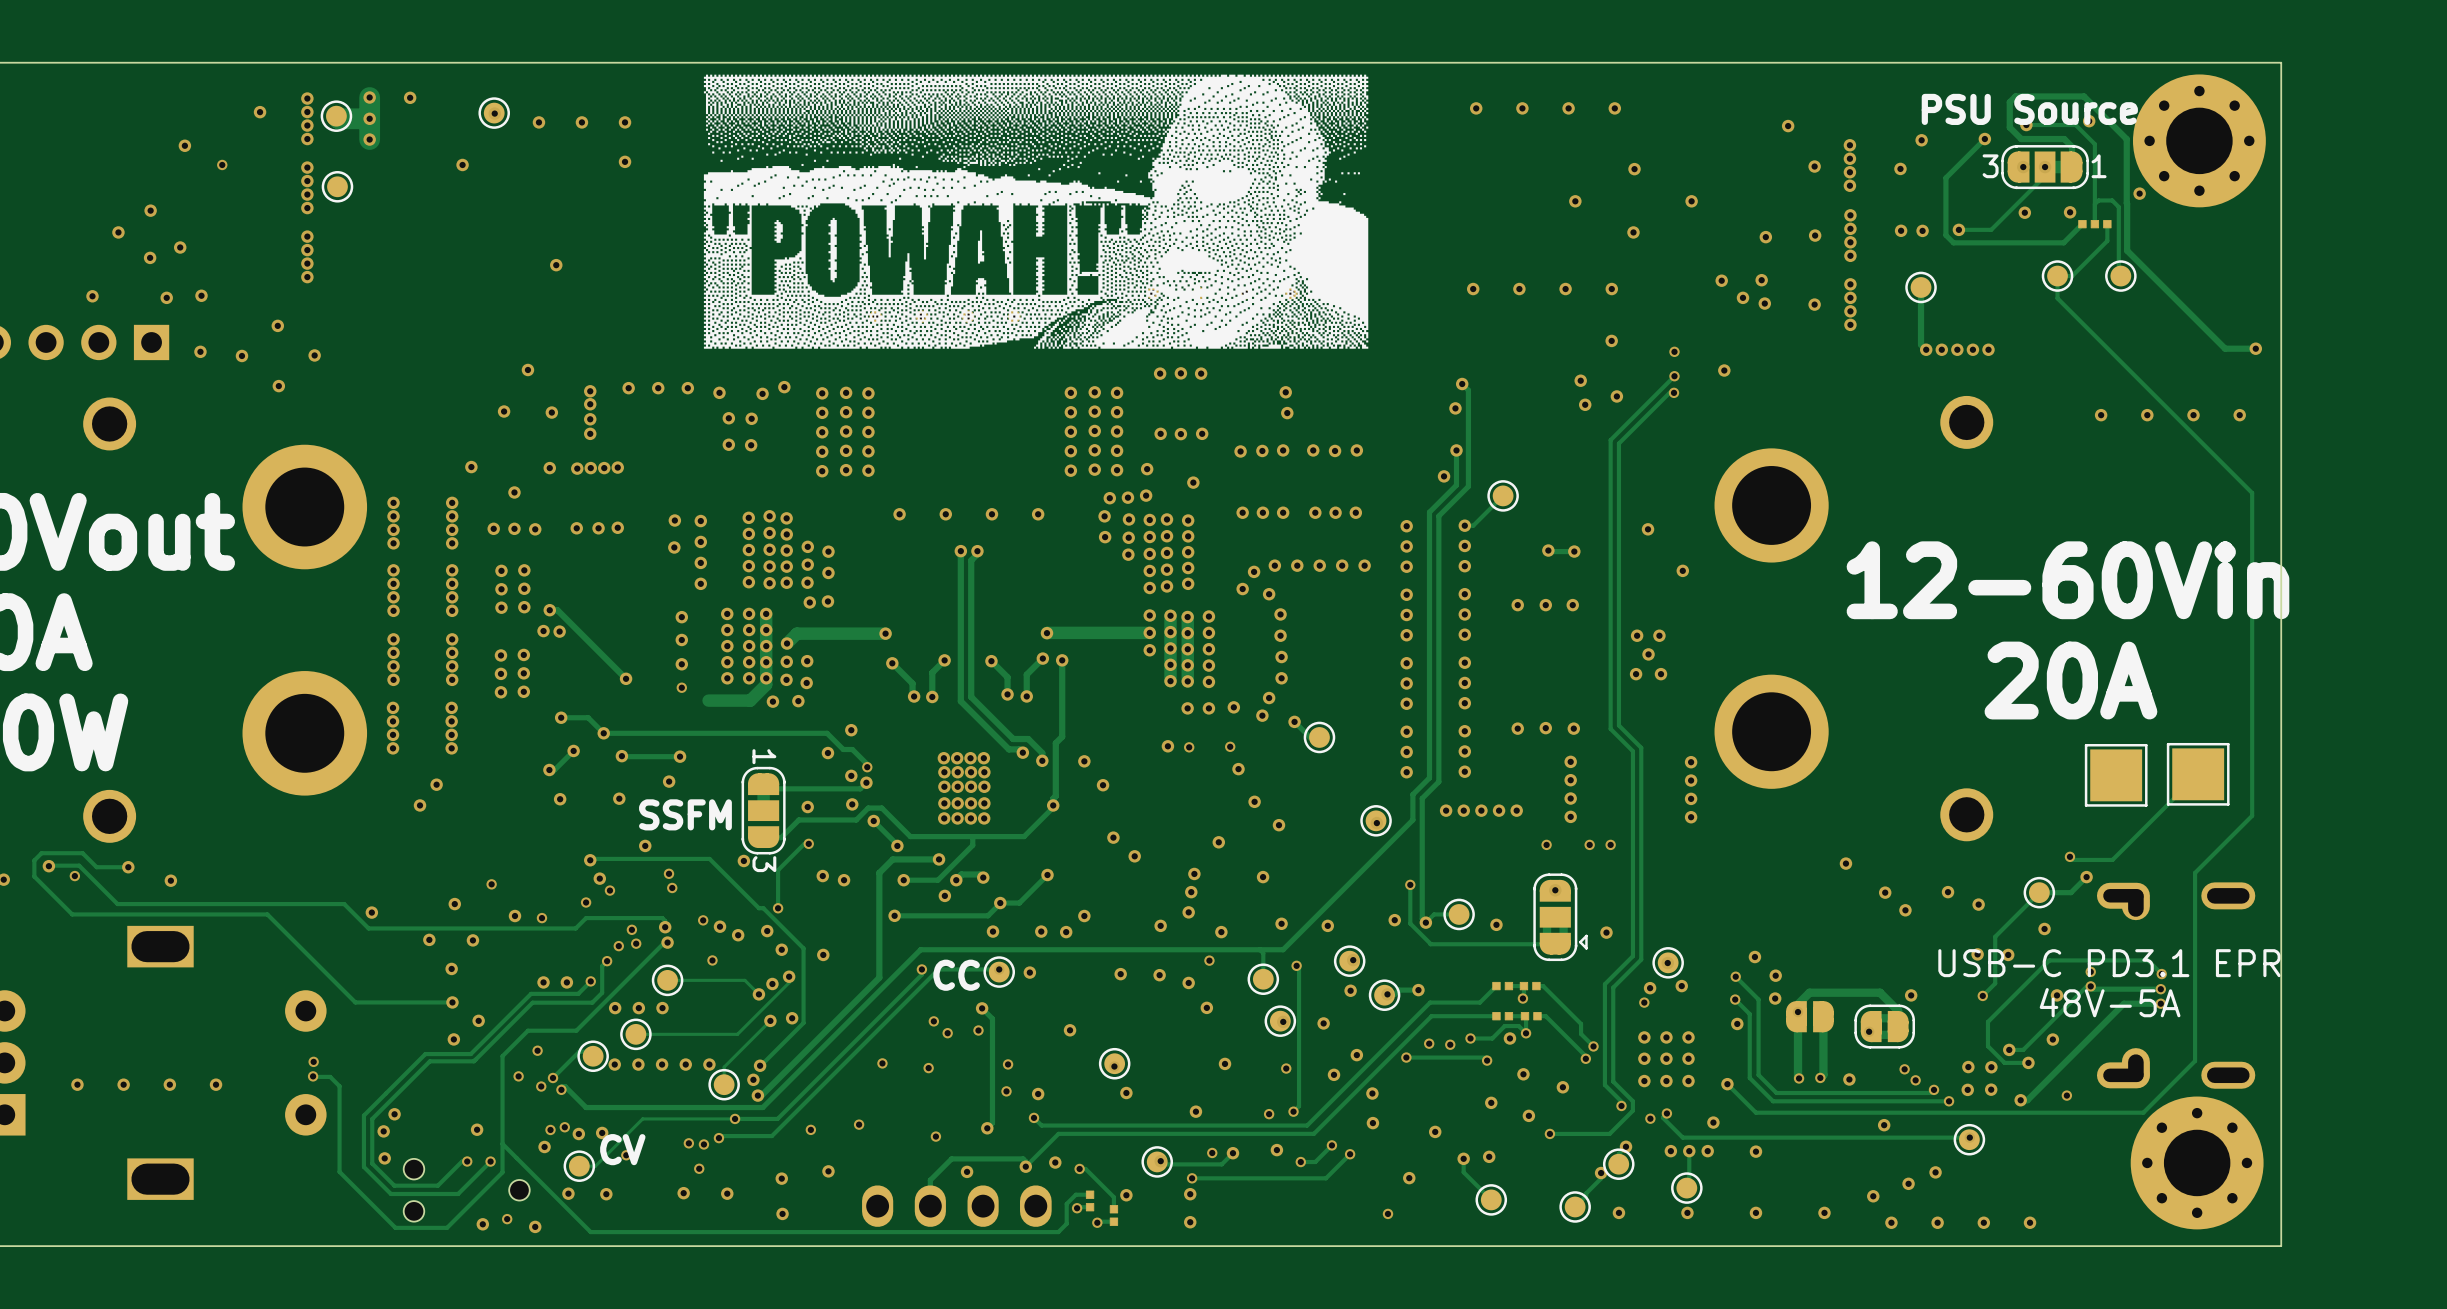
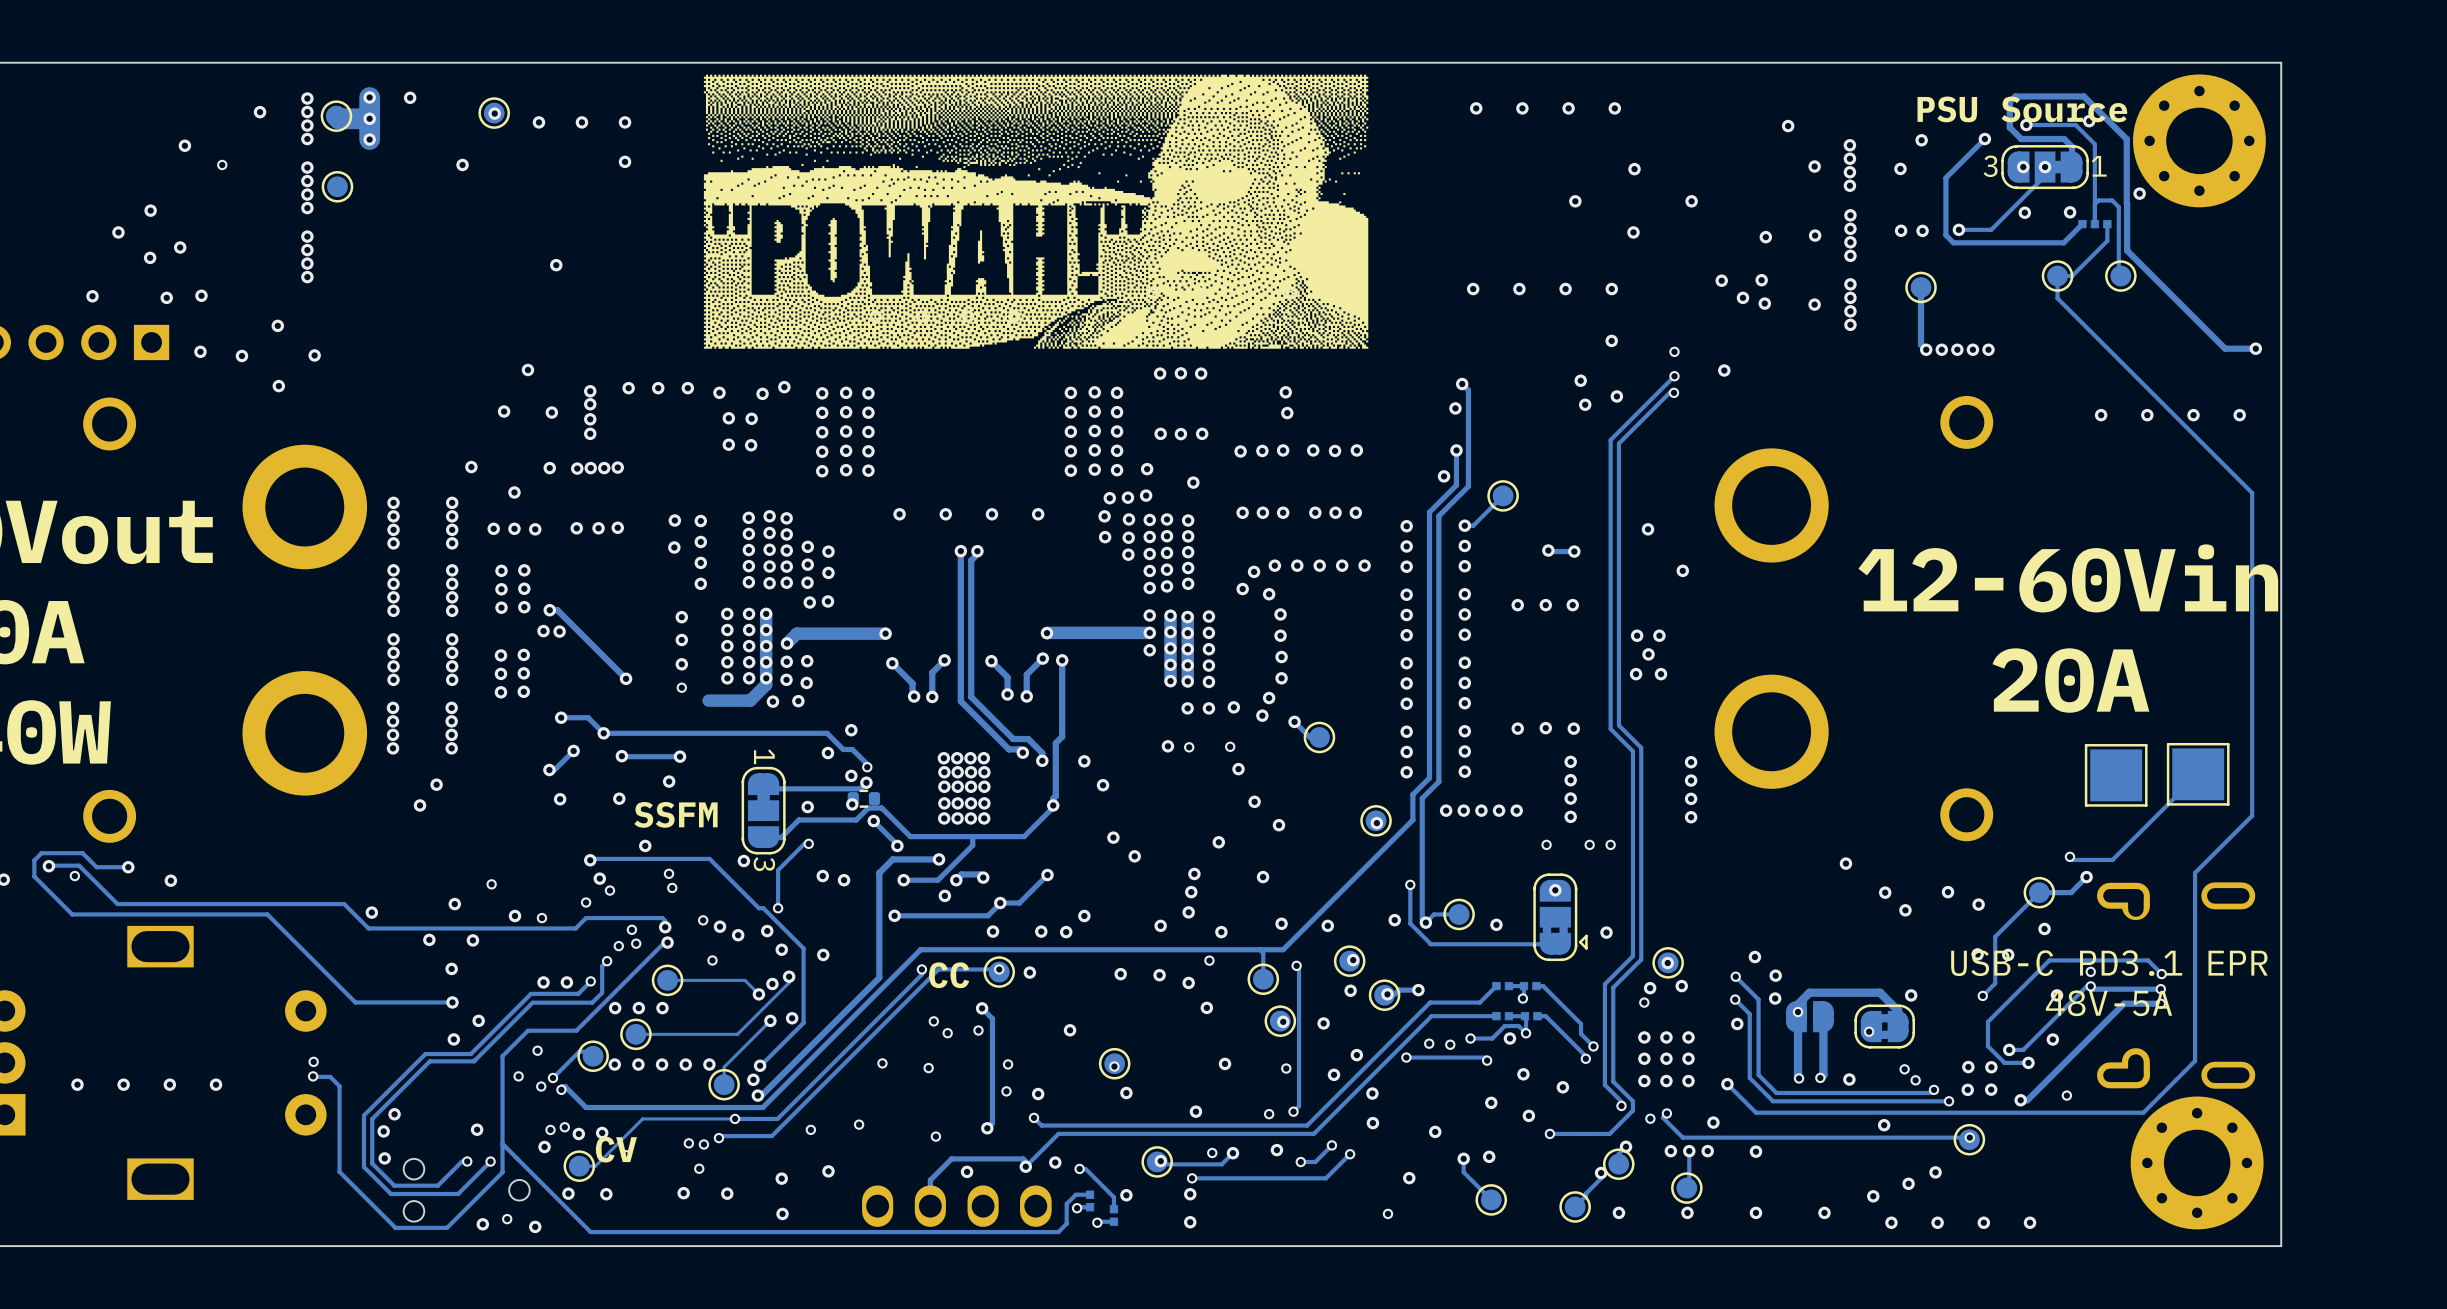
part: none -> (863, 798)

